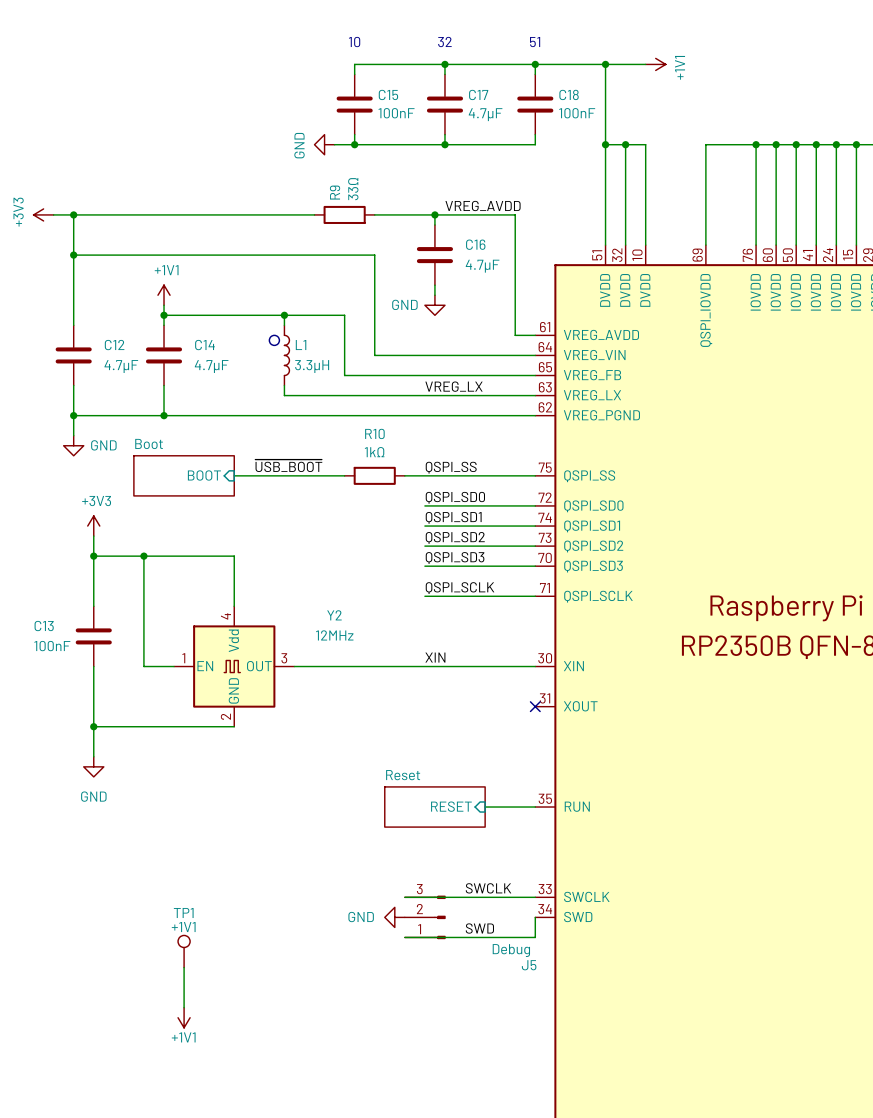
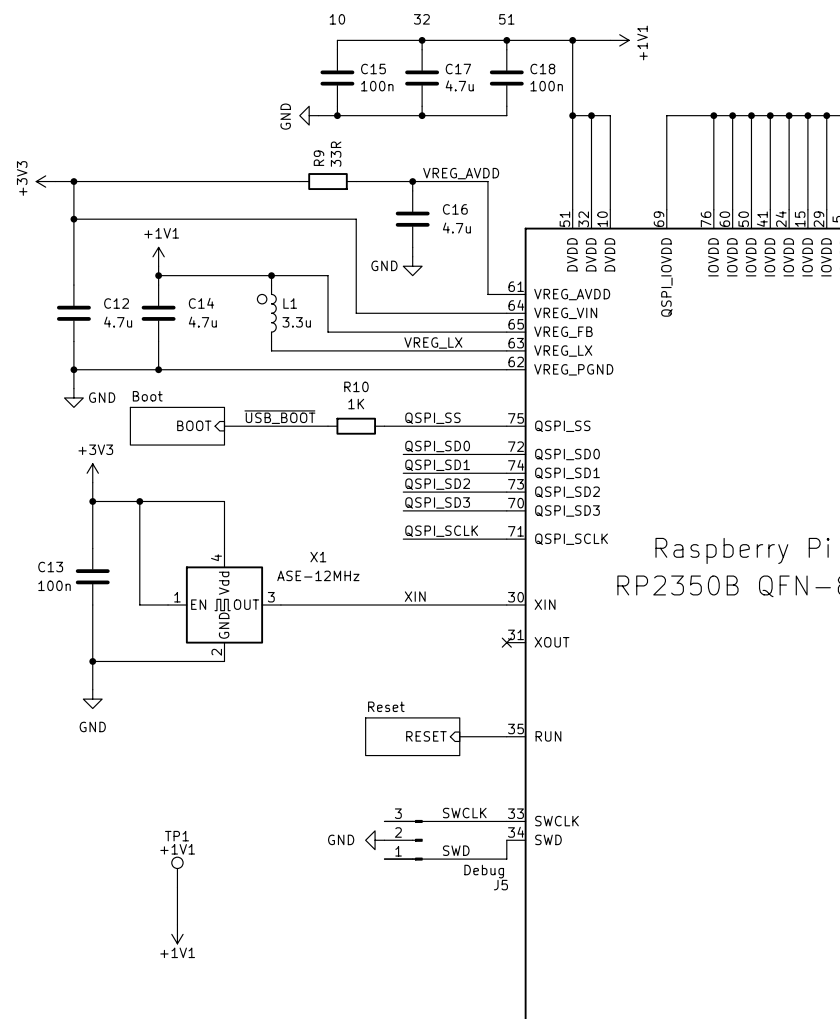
C15 value: 100nF (396, 113) -> 100n (377, 86)
C18 value: 100nF (577, 113) -> 100n (546, 86)
C17 value: 4.7µF (485, 114) -> 4.7u (459, 85)
R9 value: 33Ω (353, 189) -> 33R (336, 154)
C16 value: 4.7µF (482, 266) -> 4.7u (456, 228)
C12 value: 4.7µF (121, 366) -> 4.7u (118, 322)
C14 value: 4.7µF (211, 366) -> 4.7u (202, 322)
L1 value: 3.3µH (312, 366) -> 3.3u (296, 322)
R10 value: 1kΩ (374, 452) -> 1K (356, 404)
Y2 name: Y2 (334, 615) -> X1 (318, 557)
Y2 value: 12MHz (334, 635) -> ASE-12MHz (318, 575)
C13 value: 100nF (52, 646) -> 100n (54, 585)

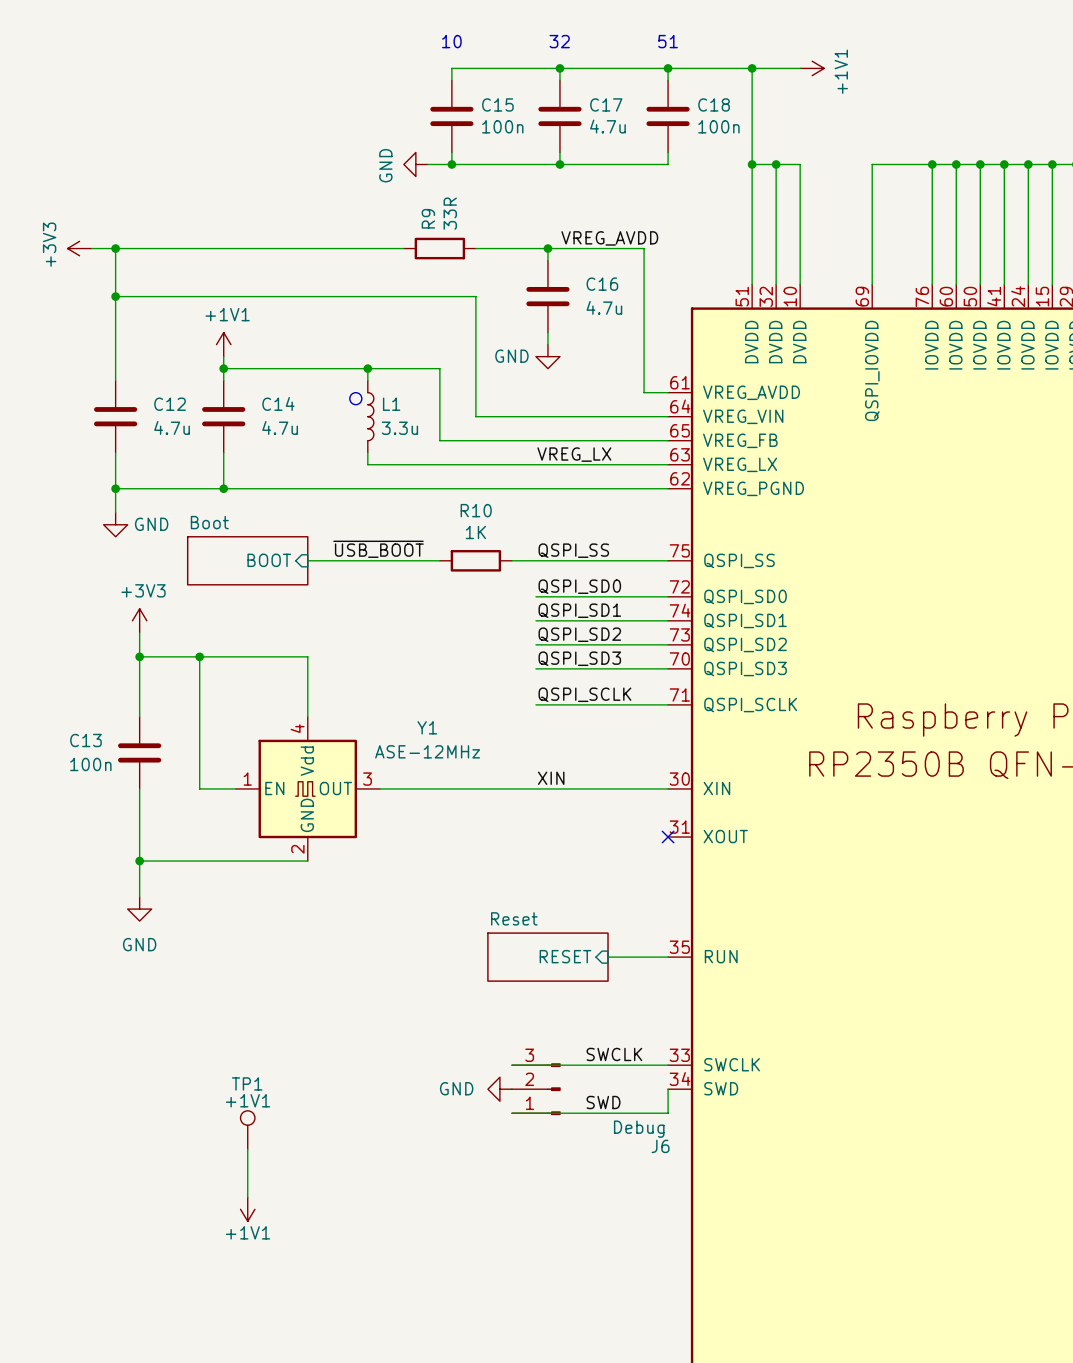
X1 name: X1 (318, 557) -> Y1 (427, 727)
J5 name: J5 (500, 885) -> J6 (660, 1146)

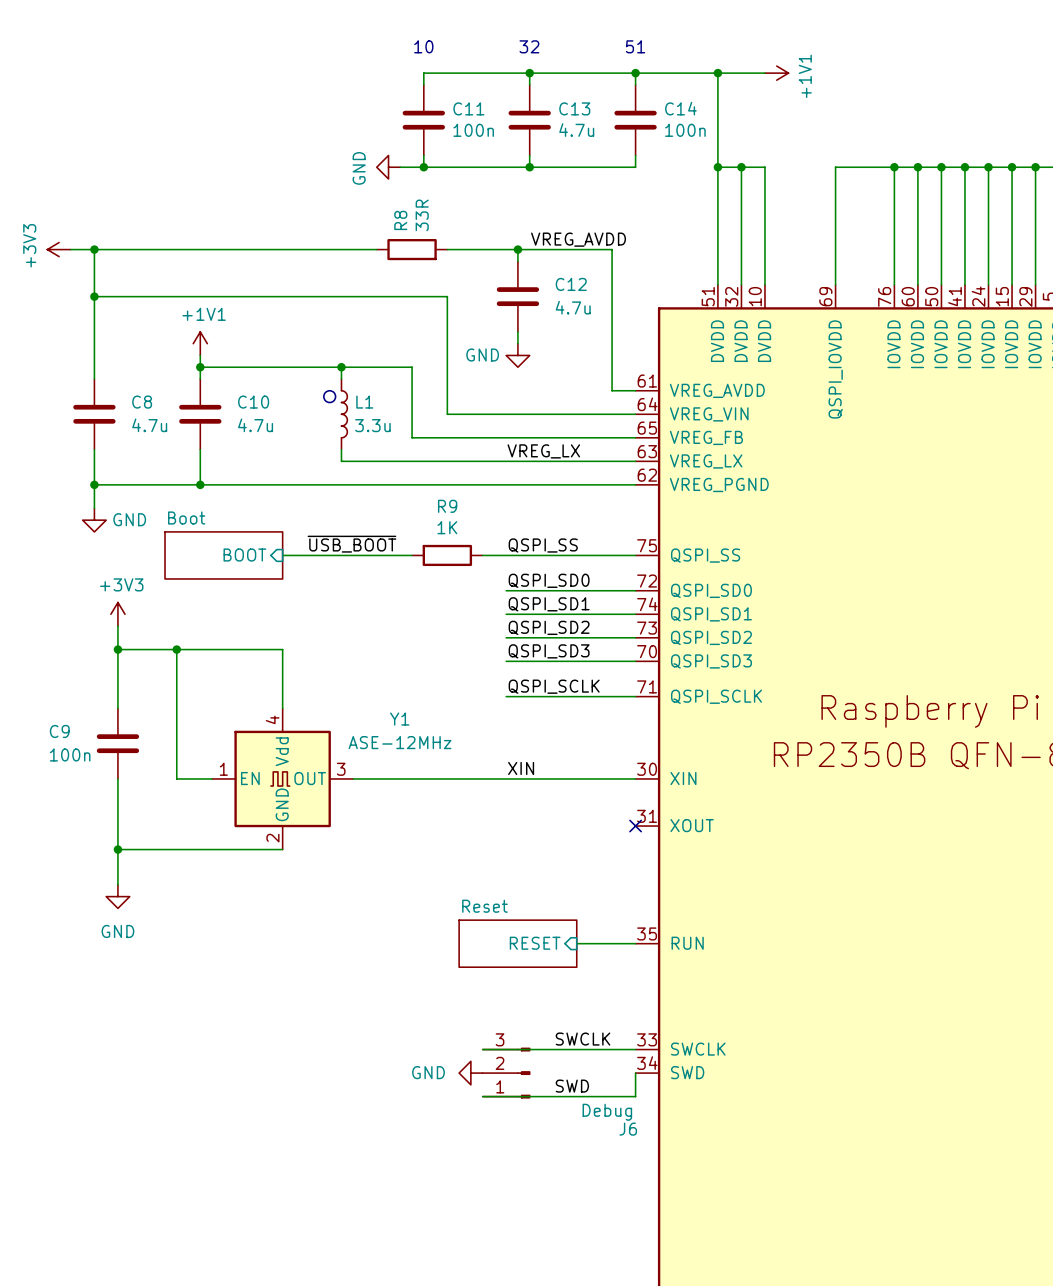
C15 name: C15 (497, 104) -> C11 (468, 108)
C17 name: C17 (606, 104) -> C13 (574, 108)
C18 name: C18 (714, 104) -> C14 (680, 108)
R9 name: R9 (428, 218) -> R8 (400, 220)
C16 name: C16 (602, 284) -> C12 (571, 284)
C14 name: C14 (278, 403) -> C10 (253, 402)
C12 name: C12 (170, 404) -> C8 (142, 402)
R10 name: R10 (476, 510) -> R9 (447, 506)
C13 name: C13 (85, 740) -> C9 (59, 731)
TP1: +1V1 (247, 1130) -> none
wire: (247, 1149) (247, 1197) -> none
power symbol: +1V1 (247, 1209) -> none

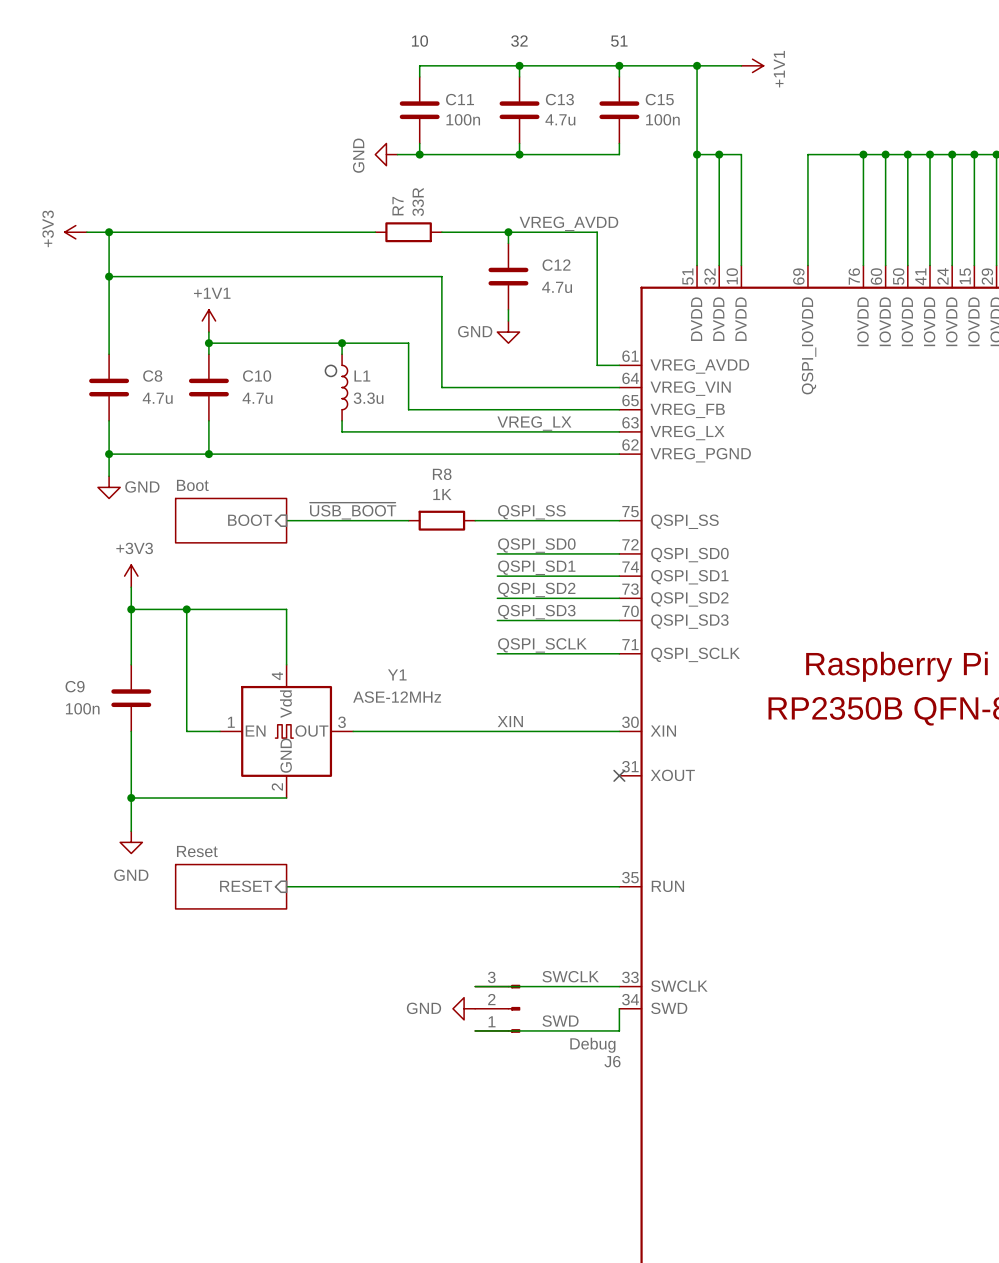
C14 name: C14 (680, 108) -> C15 (659, 99)
R8 name: R8 (400, 220) -> R7 (397, 206)
R9 name: R9 (447, 506) -> R8 (442, 474)
sheet Reset: none -> (231, 886)
sheet pin: none -> RESET (246, 886)
wire: none -> (286, 886) (563, 886)
sheet Reset: (517, 943) -> none
sheet pin: RESET (535, 943) -> none

